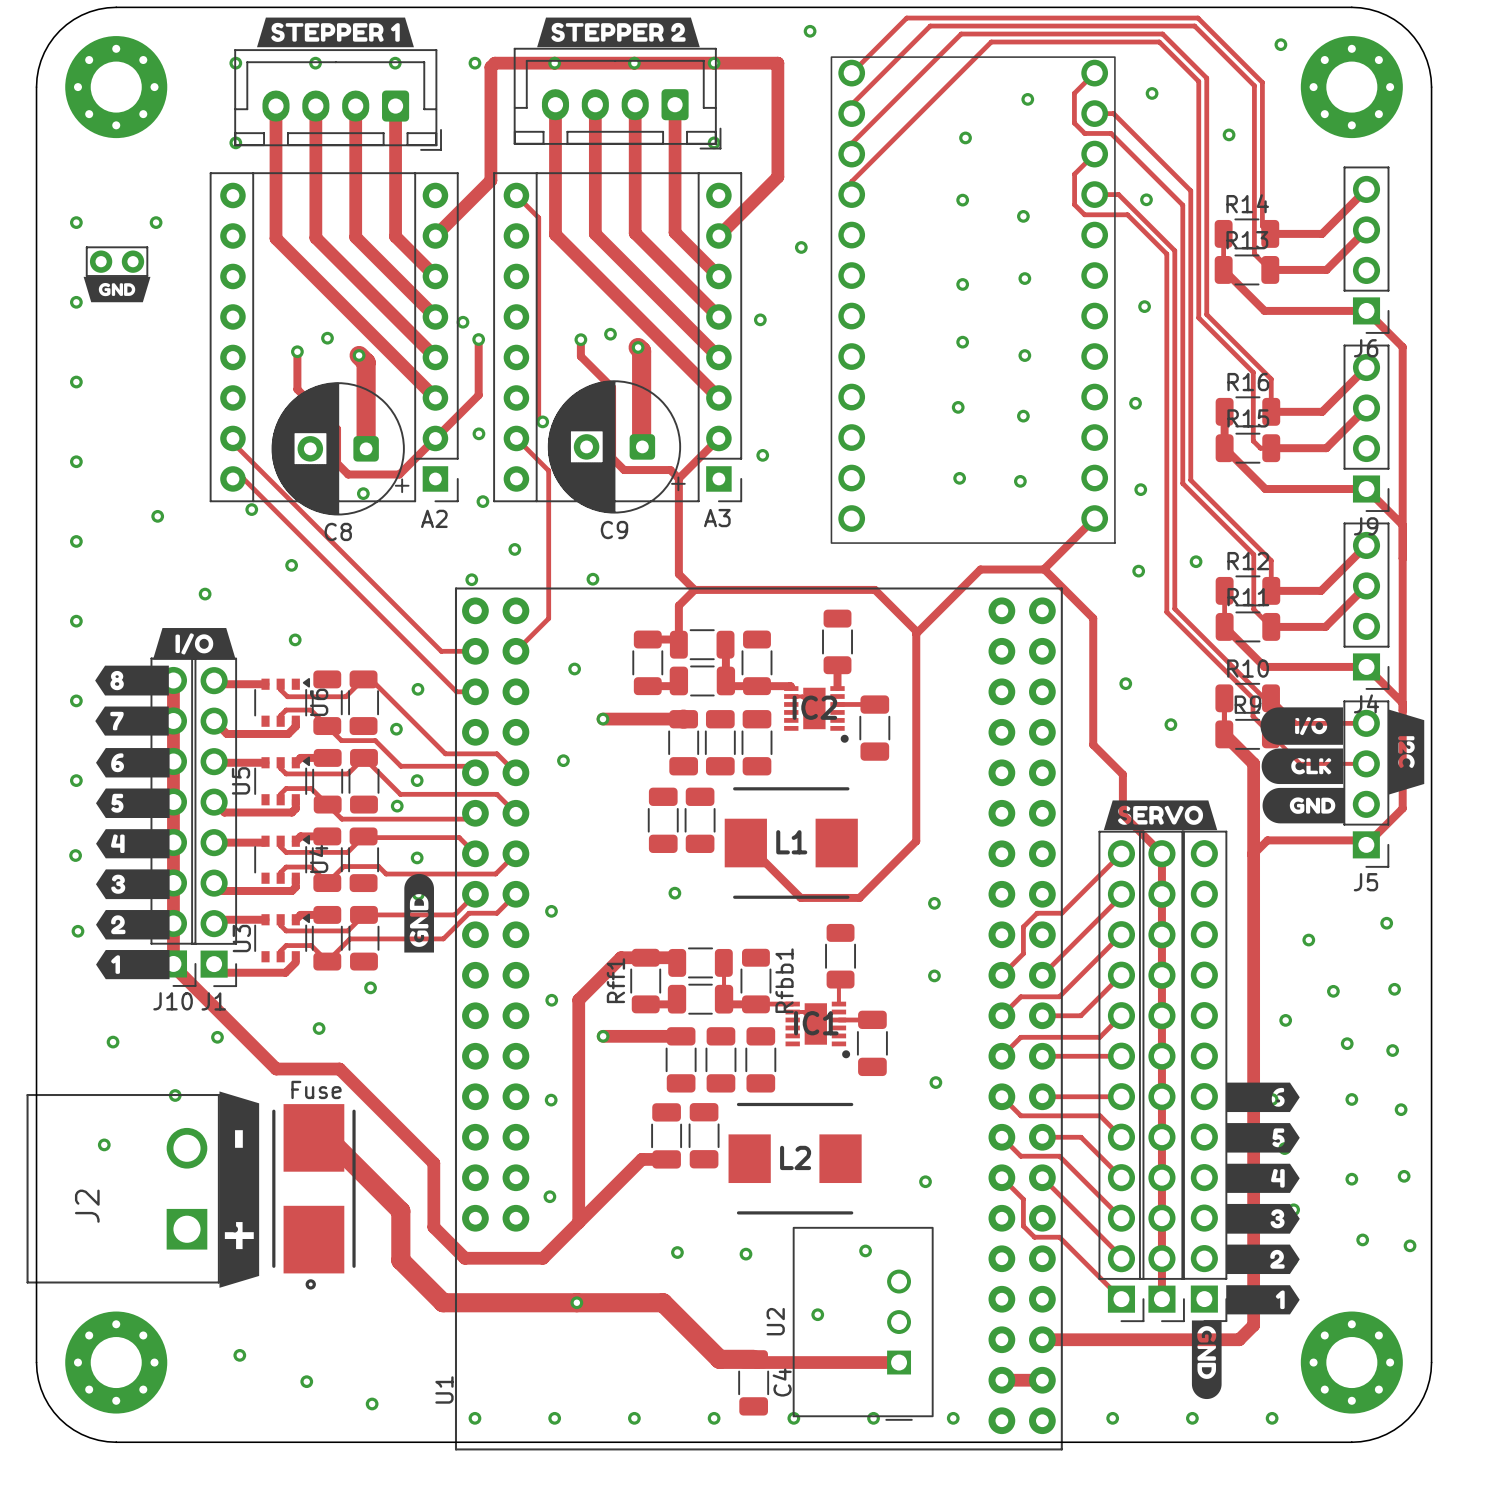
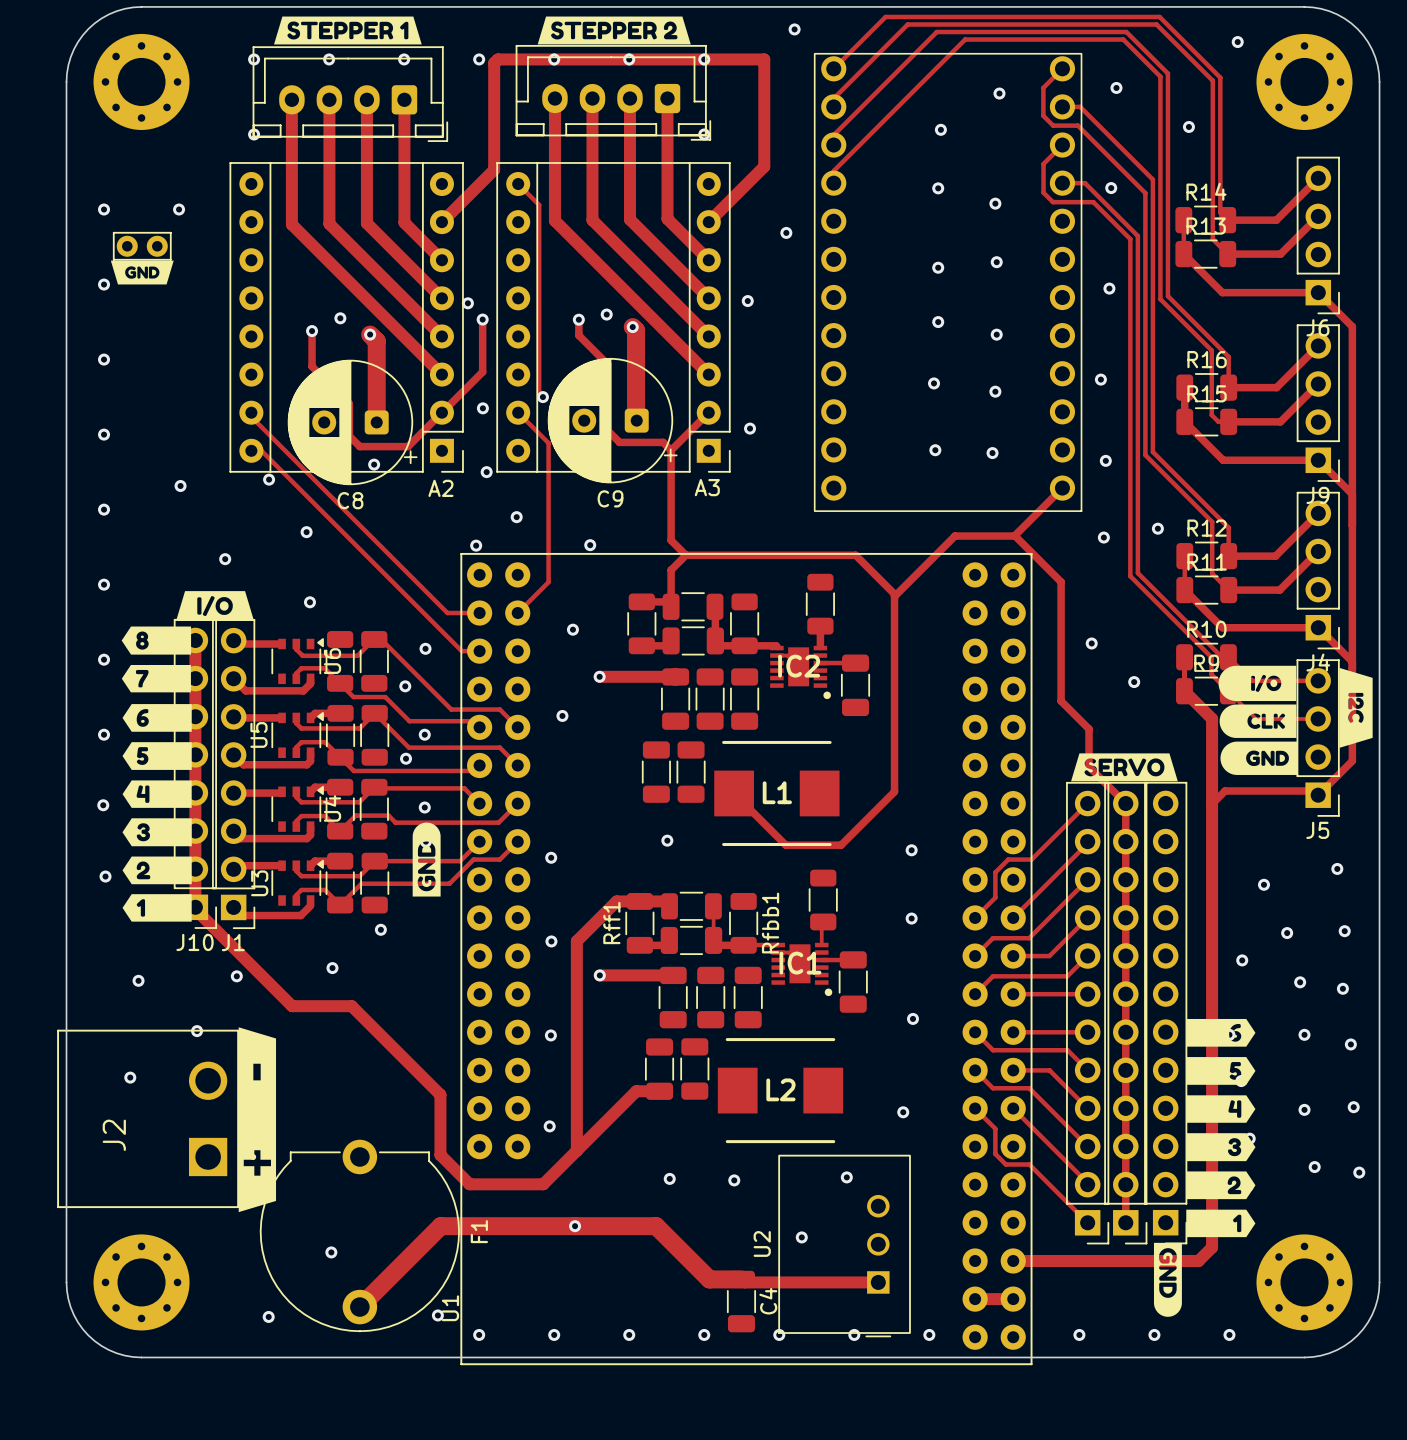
track: (313, 1137) (327, 1137) (400, 1211) (400, 1260) (443, 1302) -> (359, 1307) (440, 1226) (449, 1226)
part: Fuse (313, 1196) -> none
F1: none -> (359, 1235)
via: none -> (331, 1252)
via: (239, 1355) -> none
via: (306, 1381) -> none
via: none -> (437, 1315)
via: none -> (268, 1316)
via: (372, 1403) -> none

